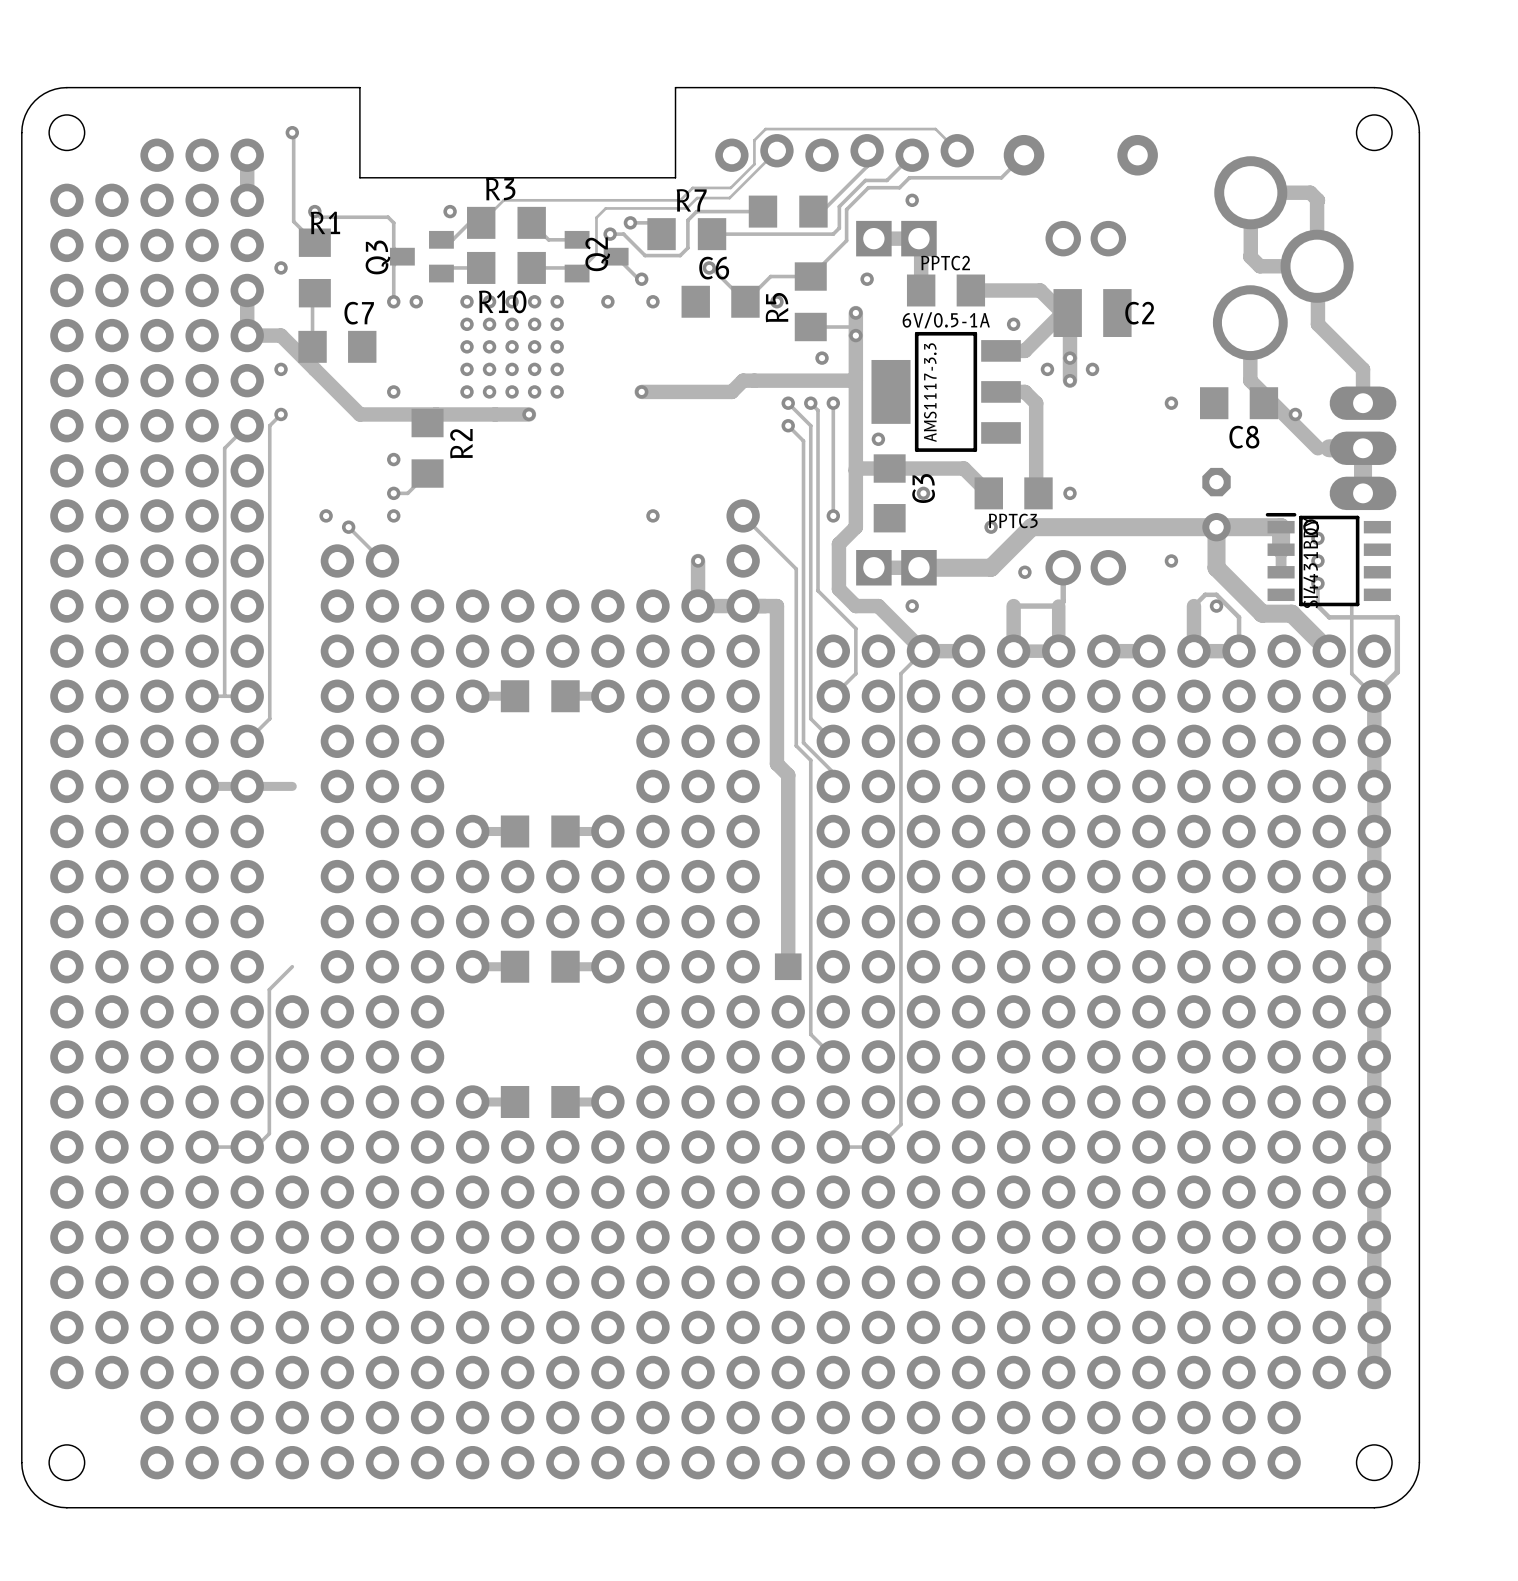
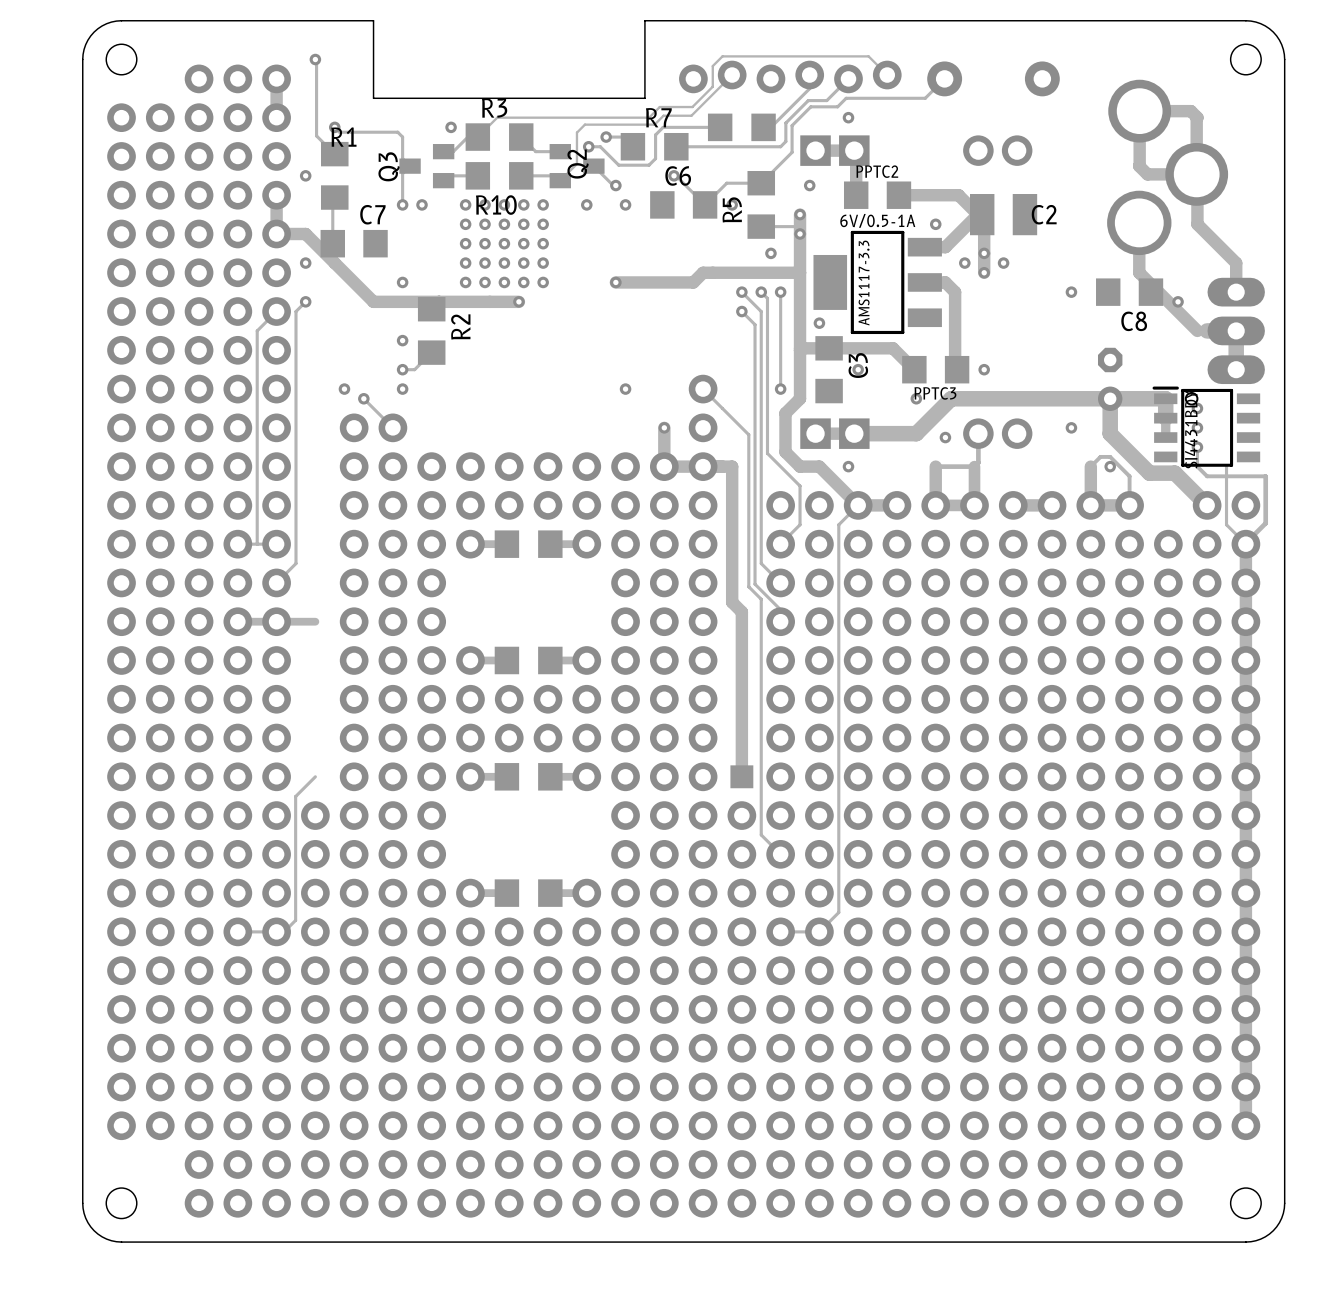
part: (1284, 1056) -> none

